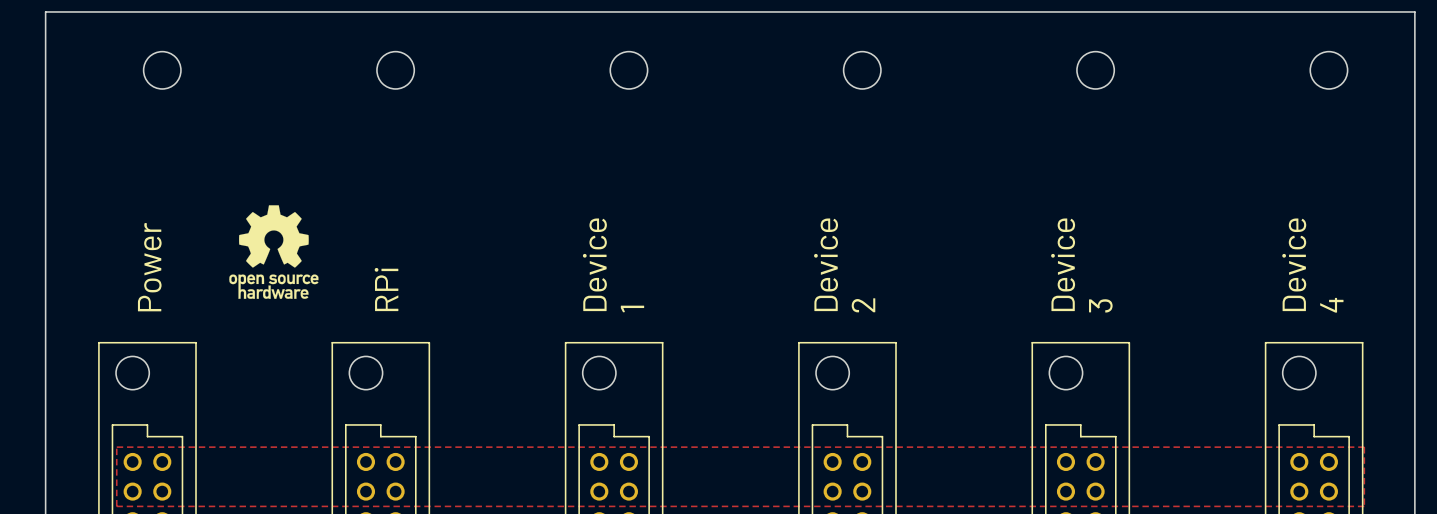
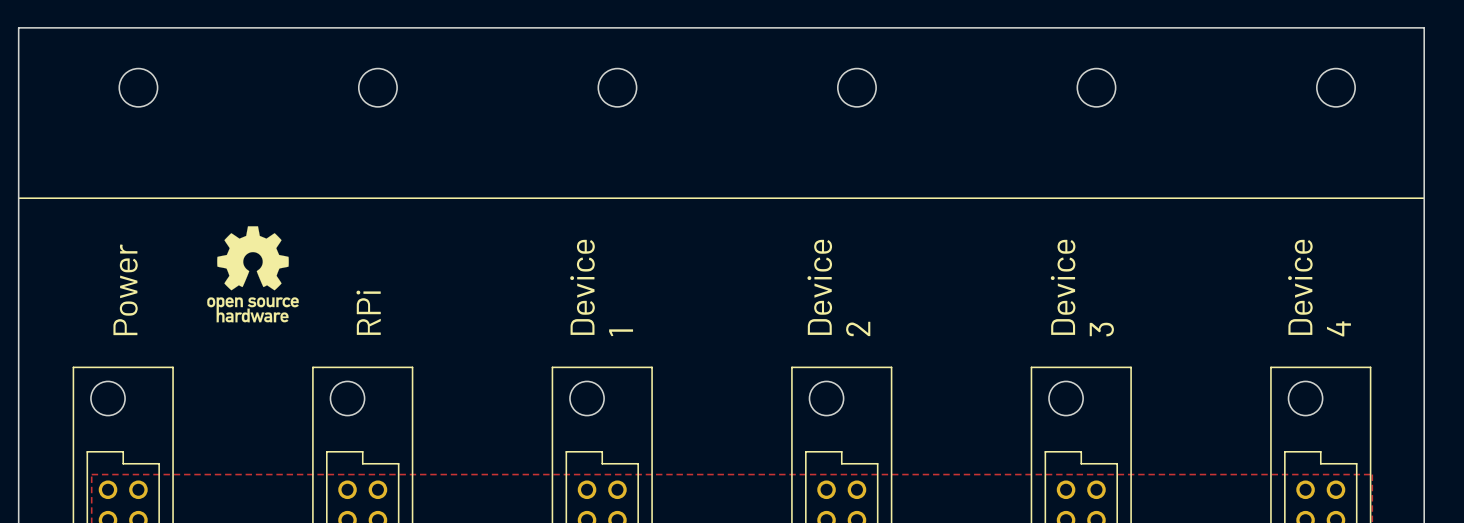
line: none -> (18, 198) (1423, 198)

